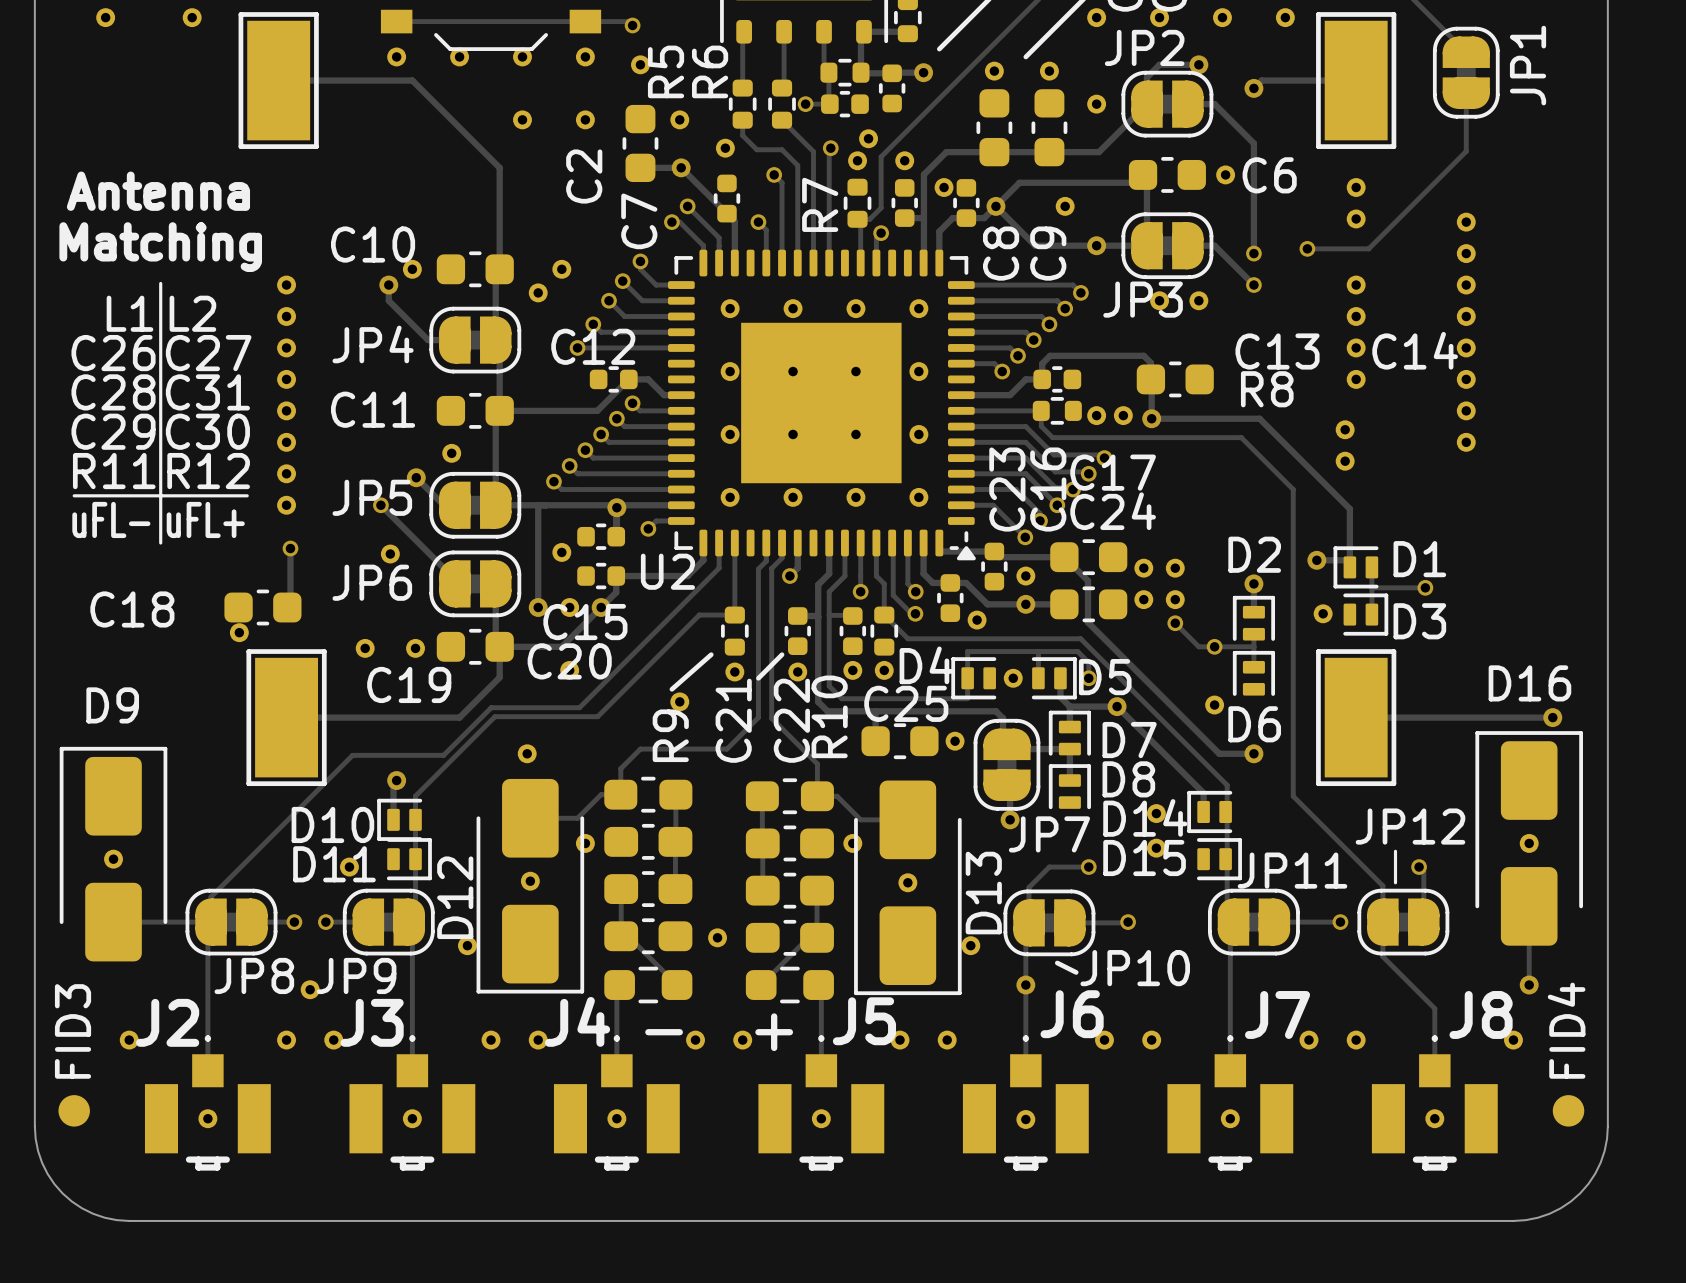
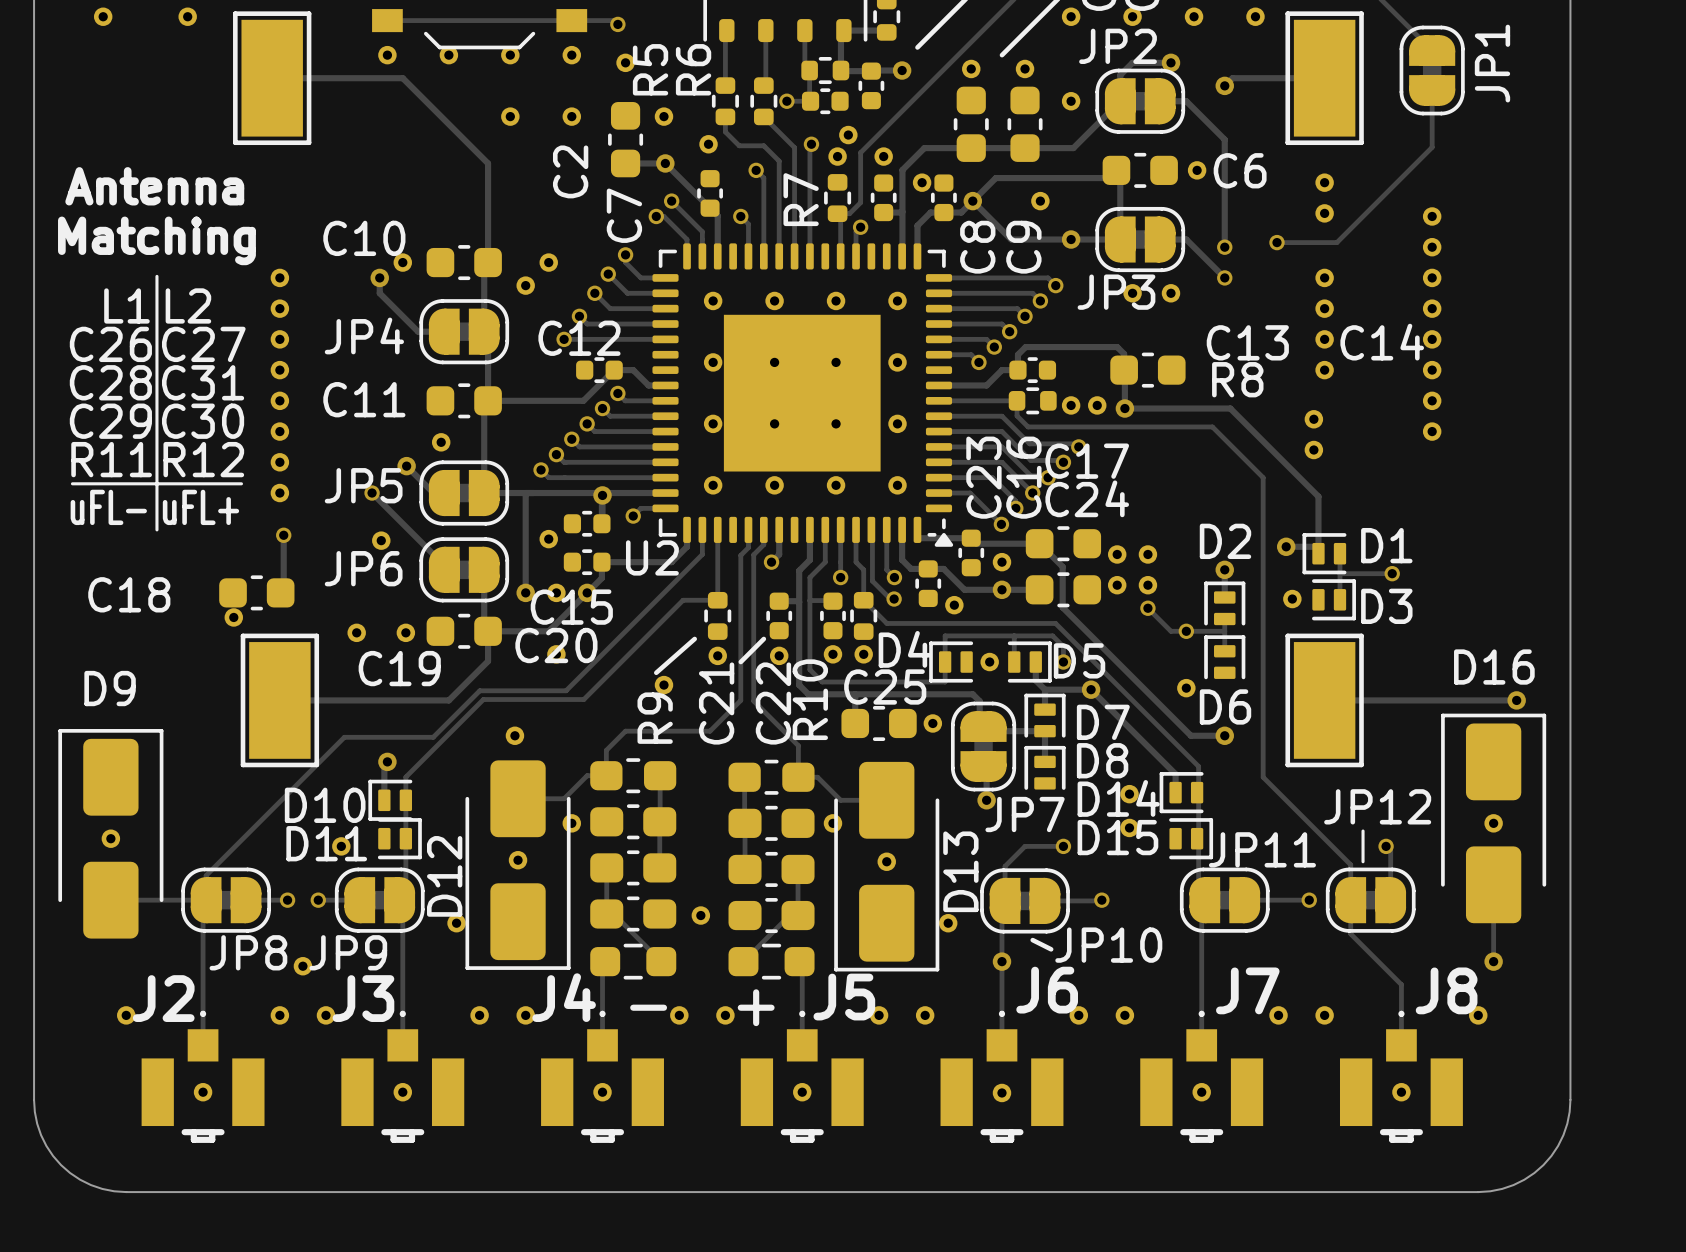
FID3: (74, 1110) -> none
FID4: (1568, 1110) -> none

